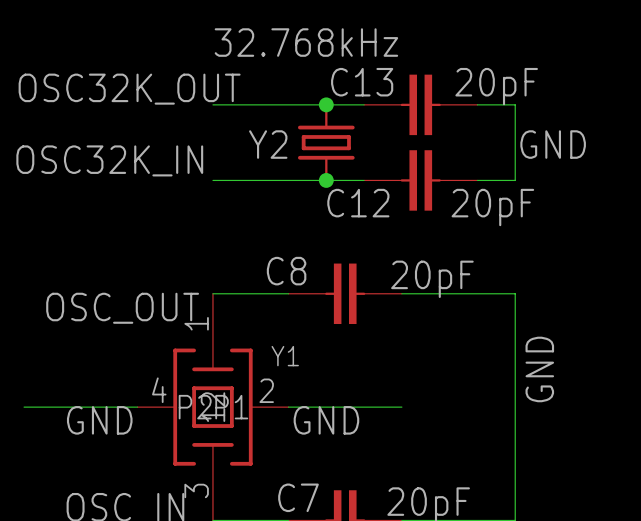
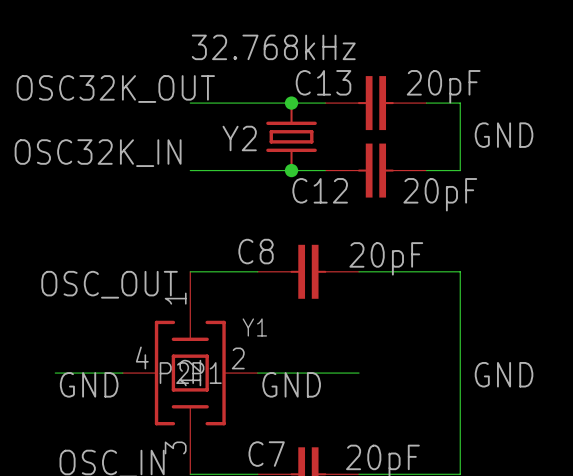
label position: GND (553, 144) -> GND (504, 135)
label rotation: 0° (539, 369) -> 90° clockwise (504, 374)
wire: (24, 407) (61, 407) -> none

